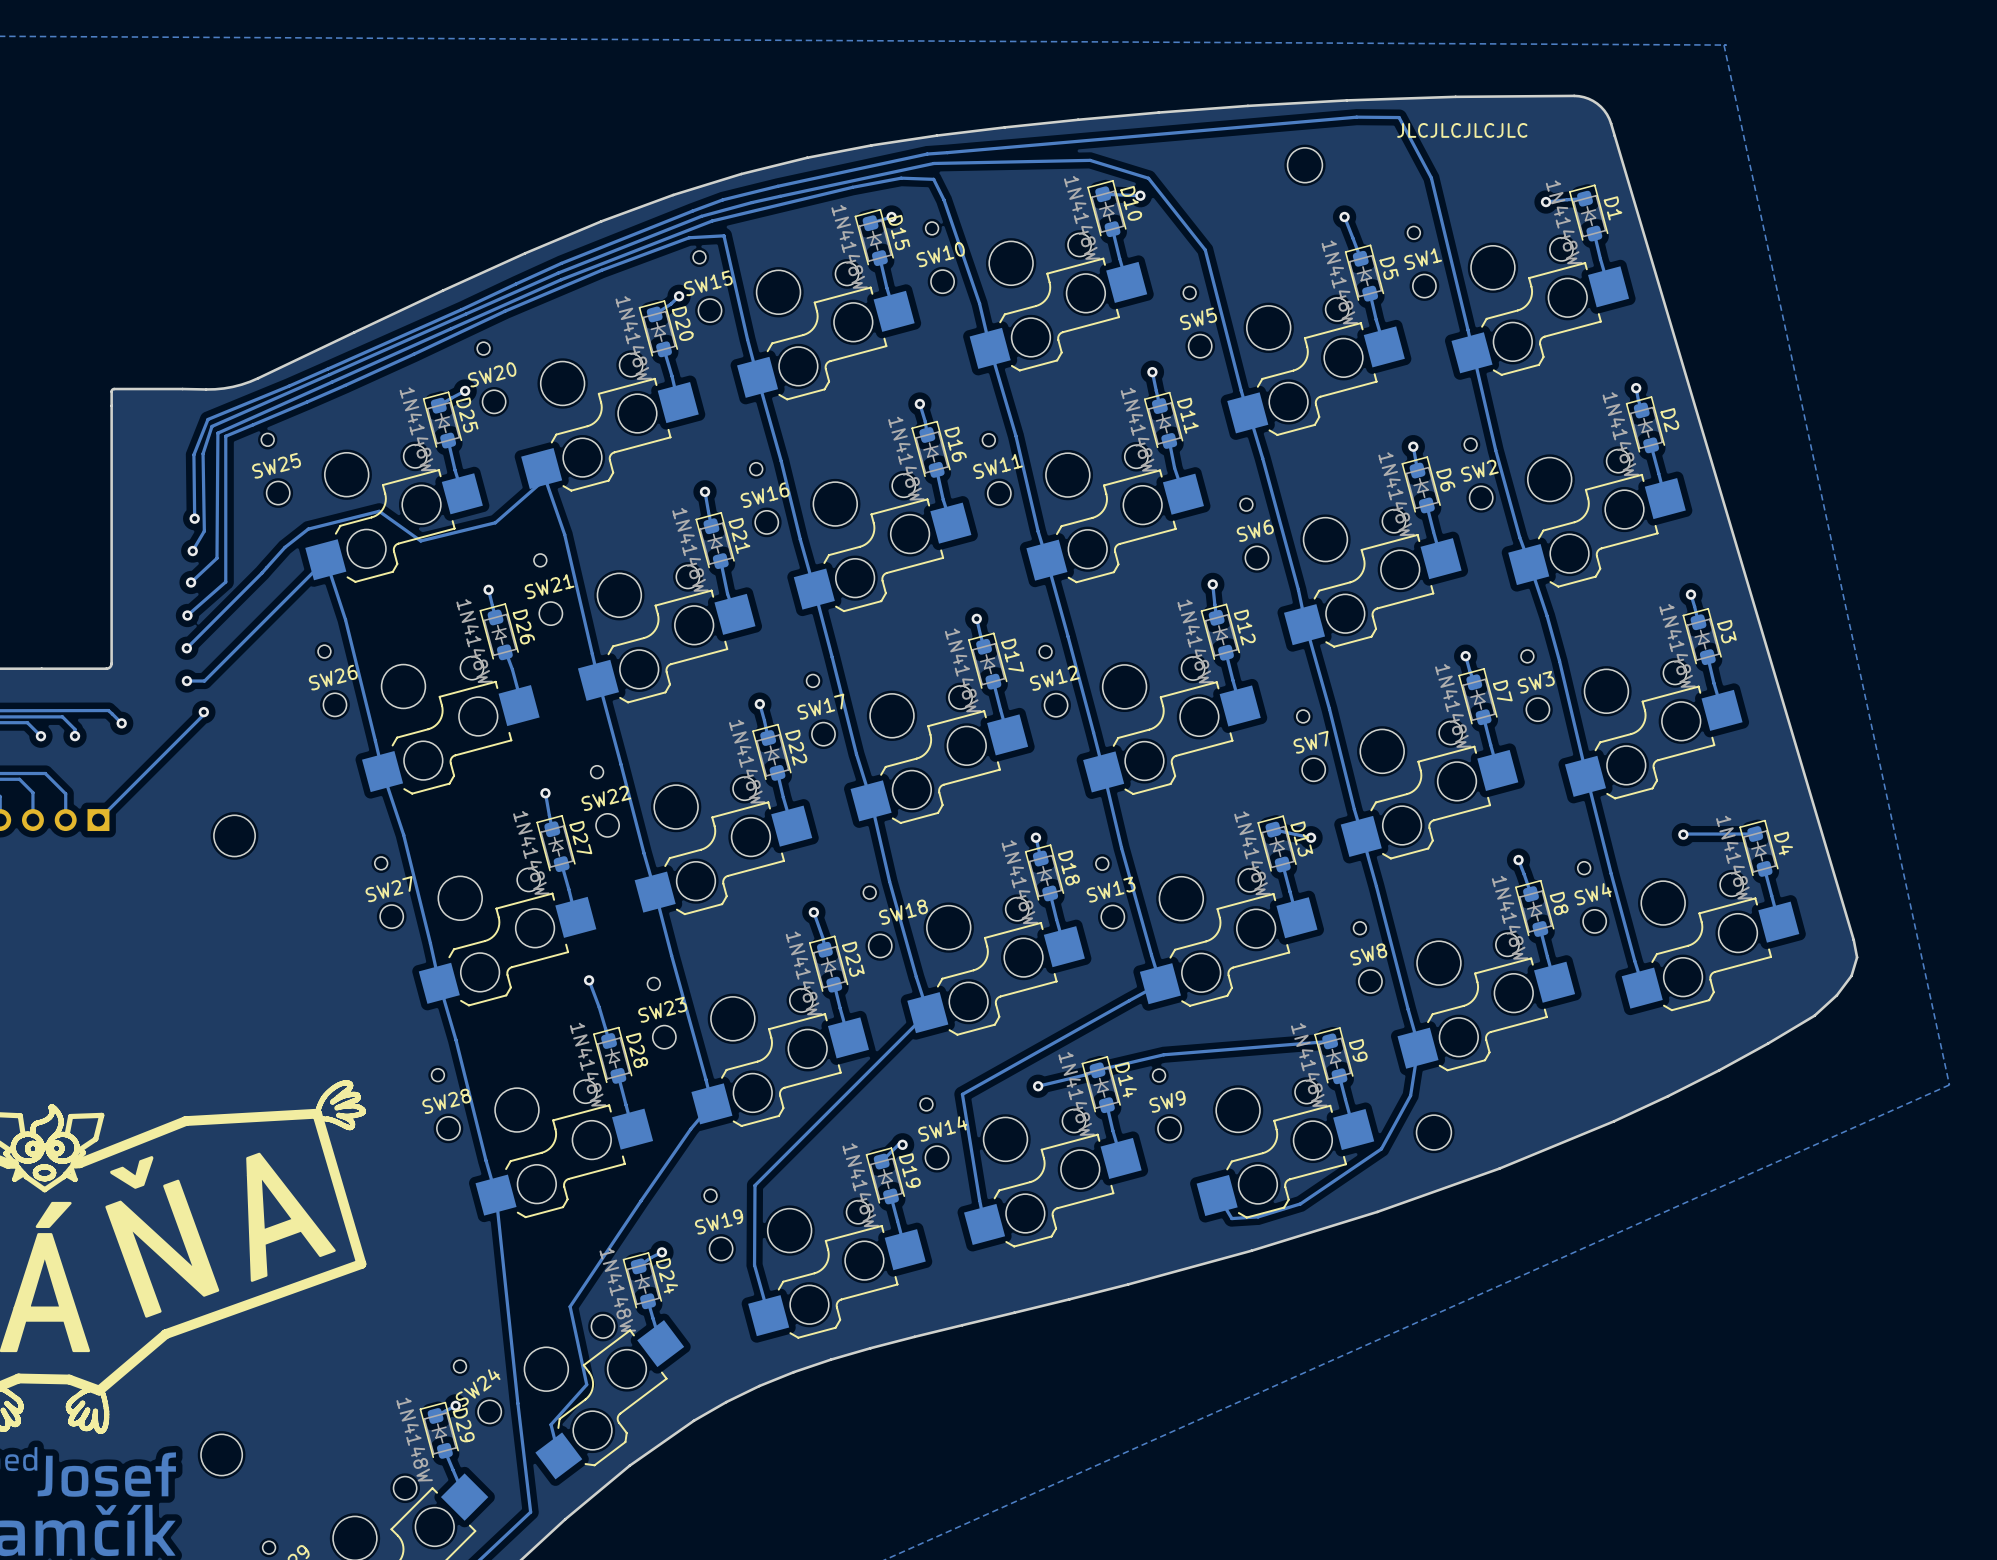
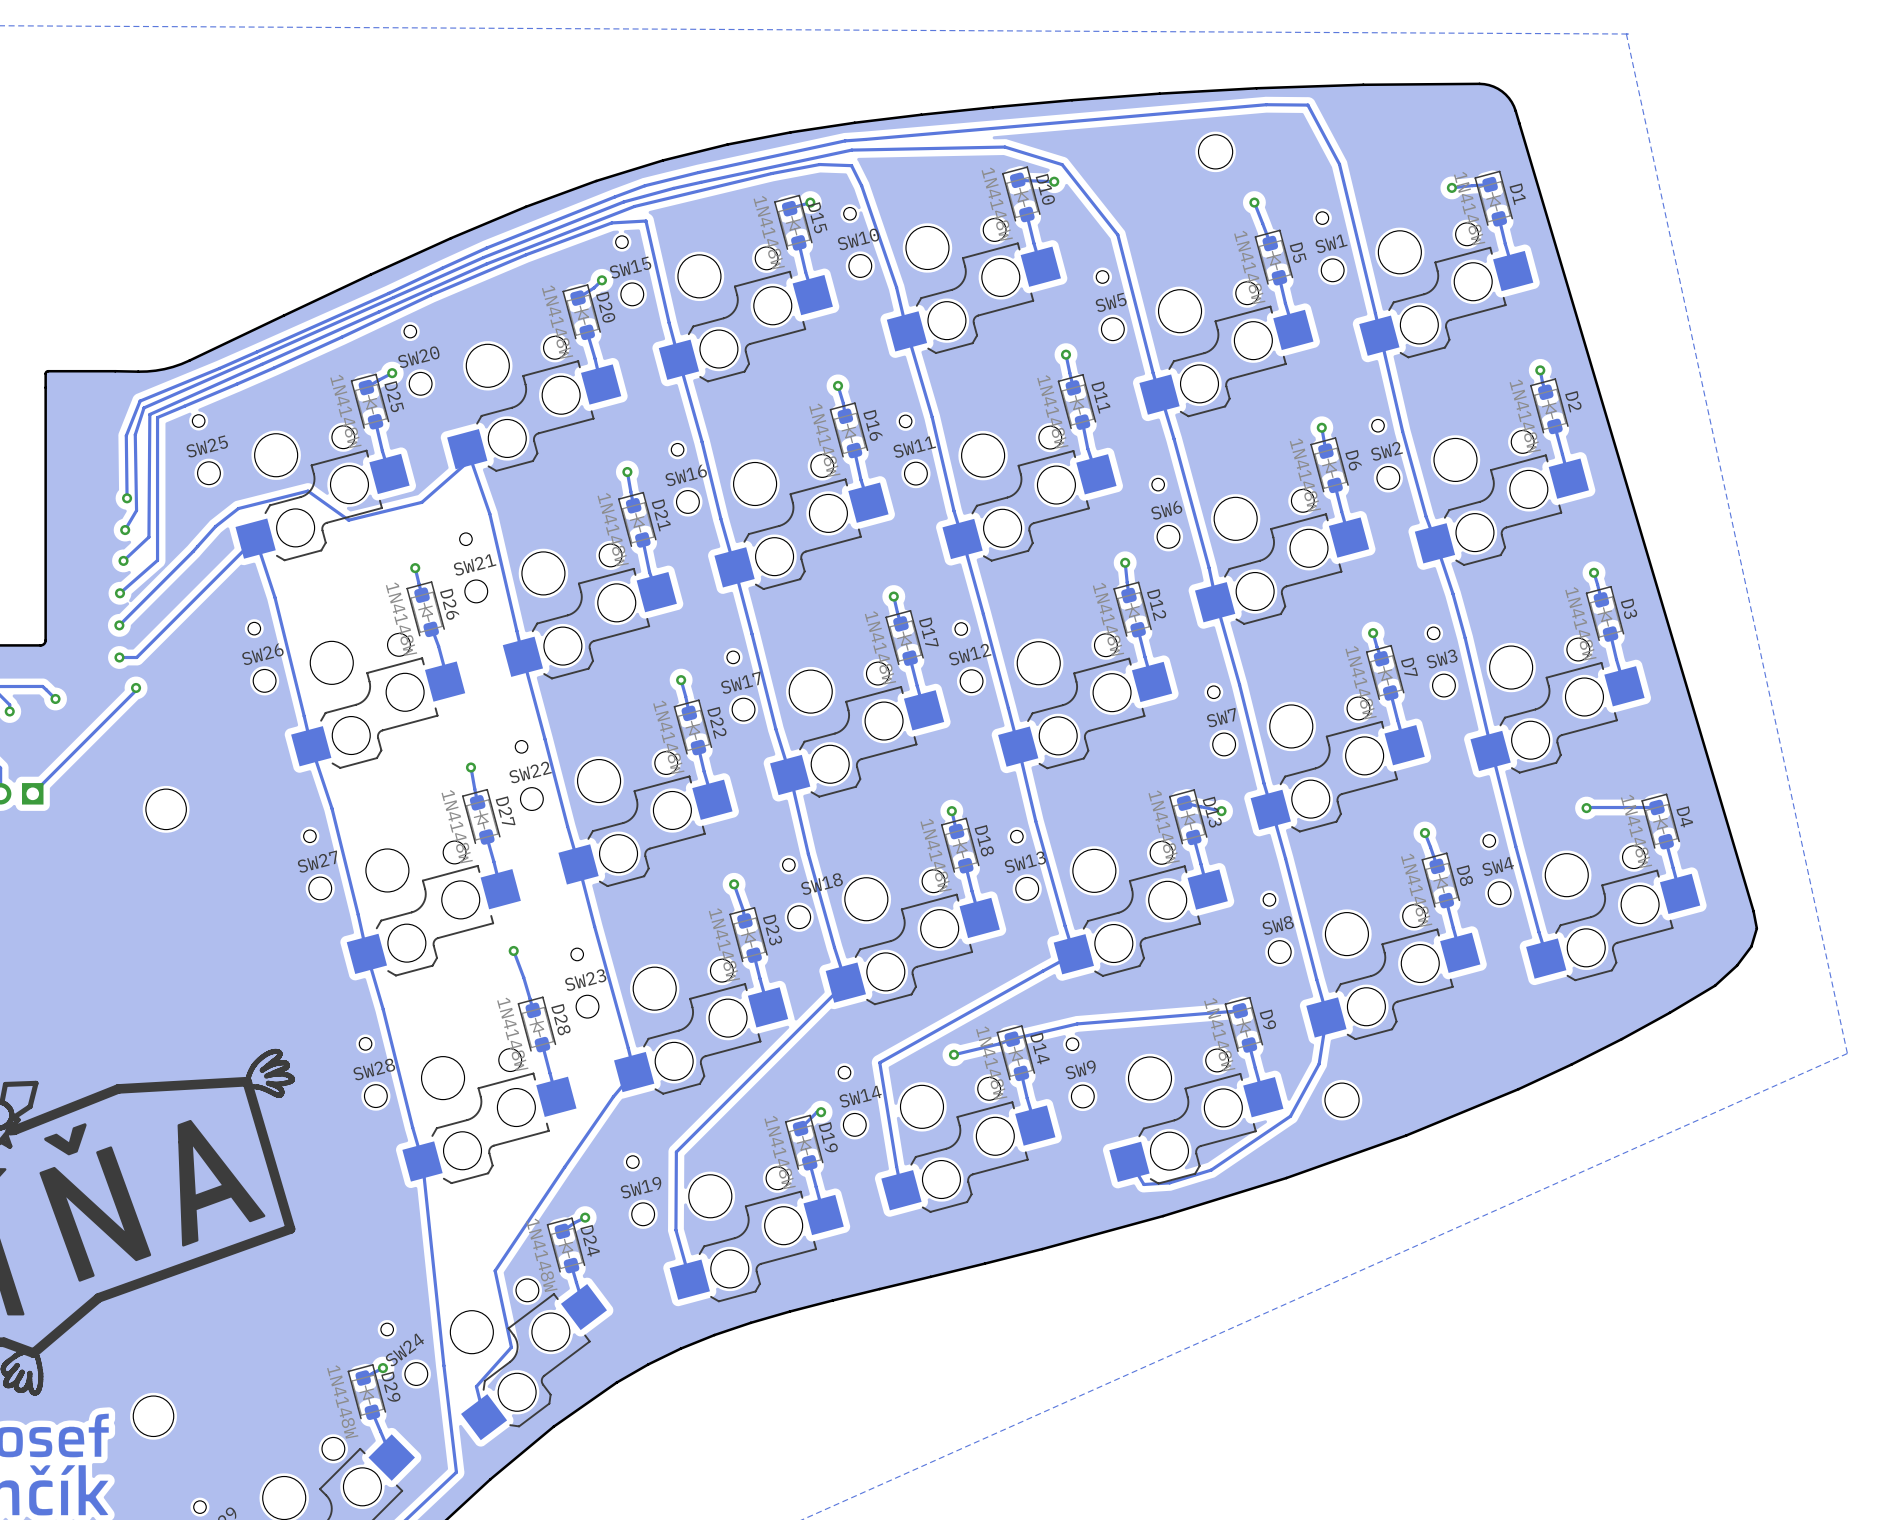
text: JLCJLCJLCJLC (1462, 130) -> none

